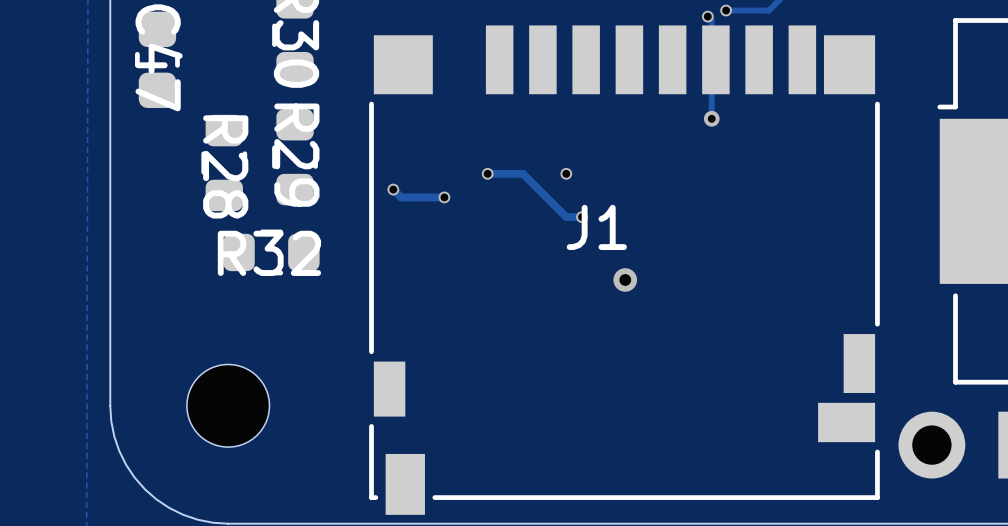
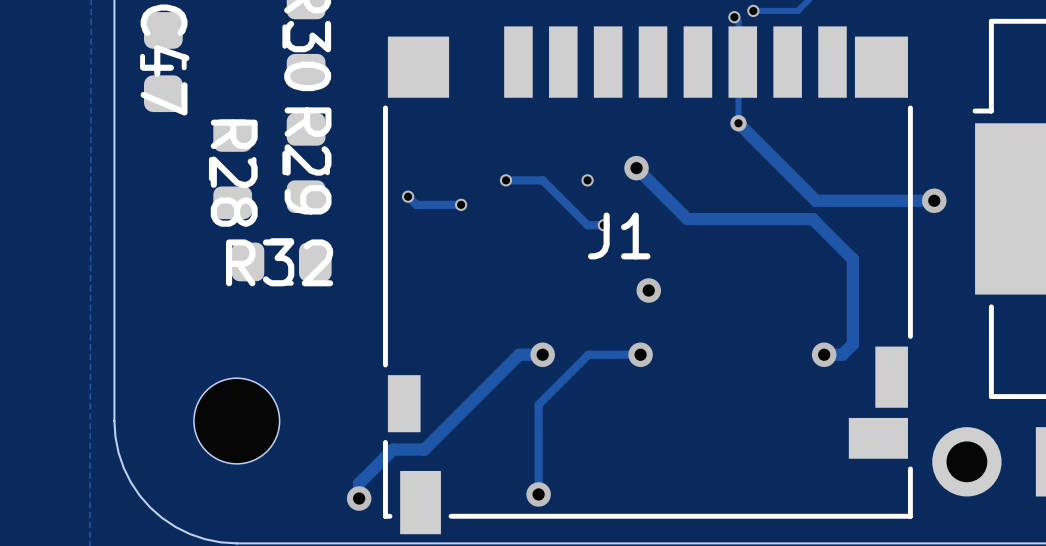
track: none -> (738, 123) (815, 200) (934, 200)
track: none -> (636, 168) (687, 219) (812, 219) (852, 259) (852, 344) (842, 354) (824, 354)
via: none -> (636, 168)
via: none -> (934, 200)
track: none -> (542, 354) (519, 354) (424, 449) (393, 449) (359, 483) (359, 498)
via: none -> (542, 354)
track: none -> (640, 354) (588, 354) (538, 404) (538, 494)
via: none -> (640, 354)
via: none -> (824, 354)
via: none -> (538, 494)
via: none -> (359, 498)

